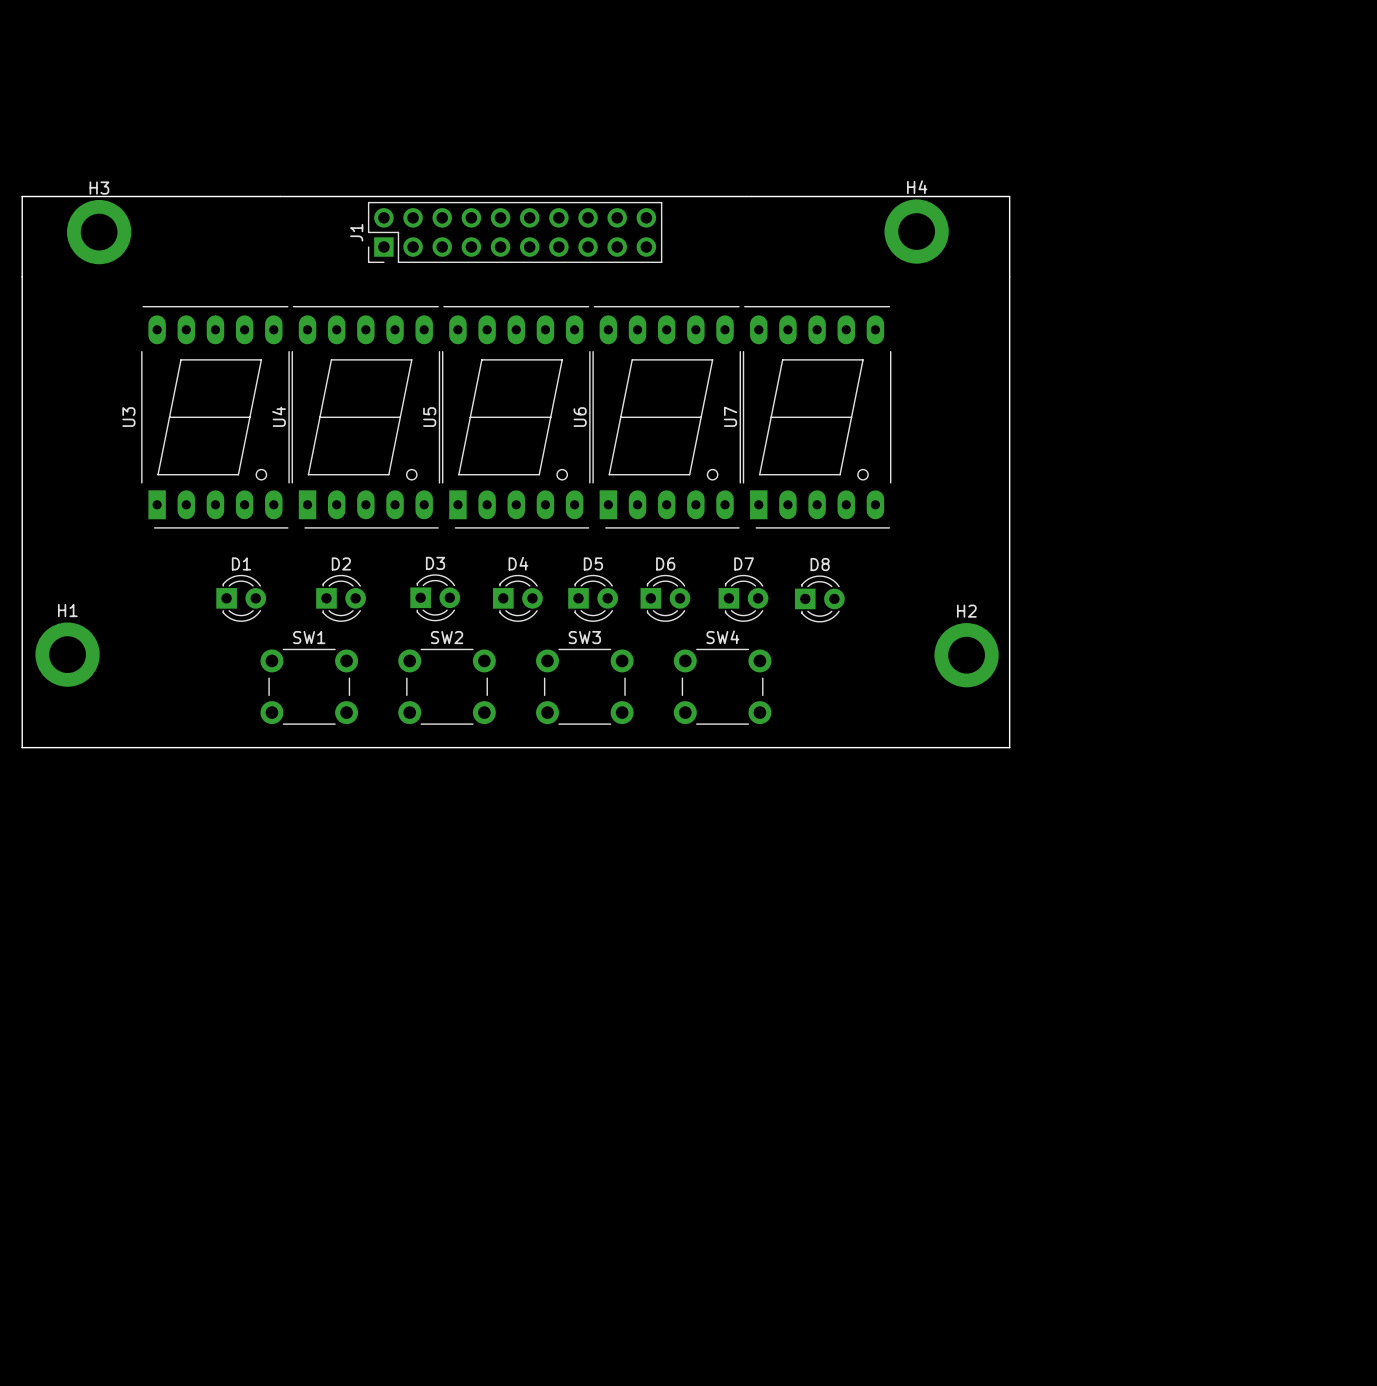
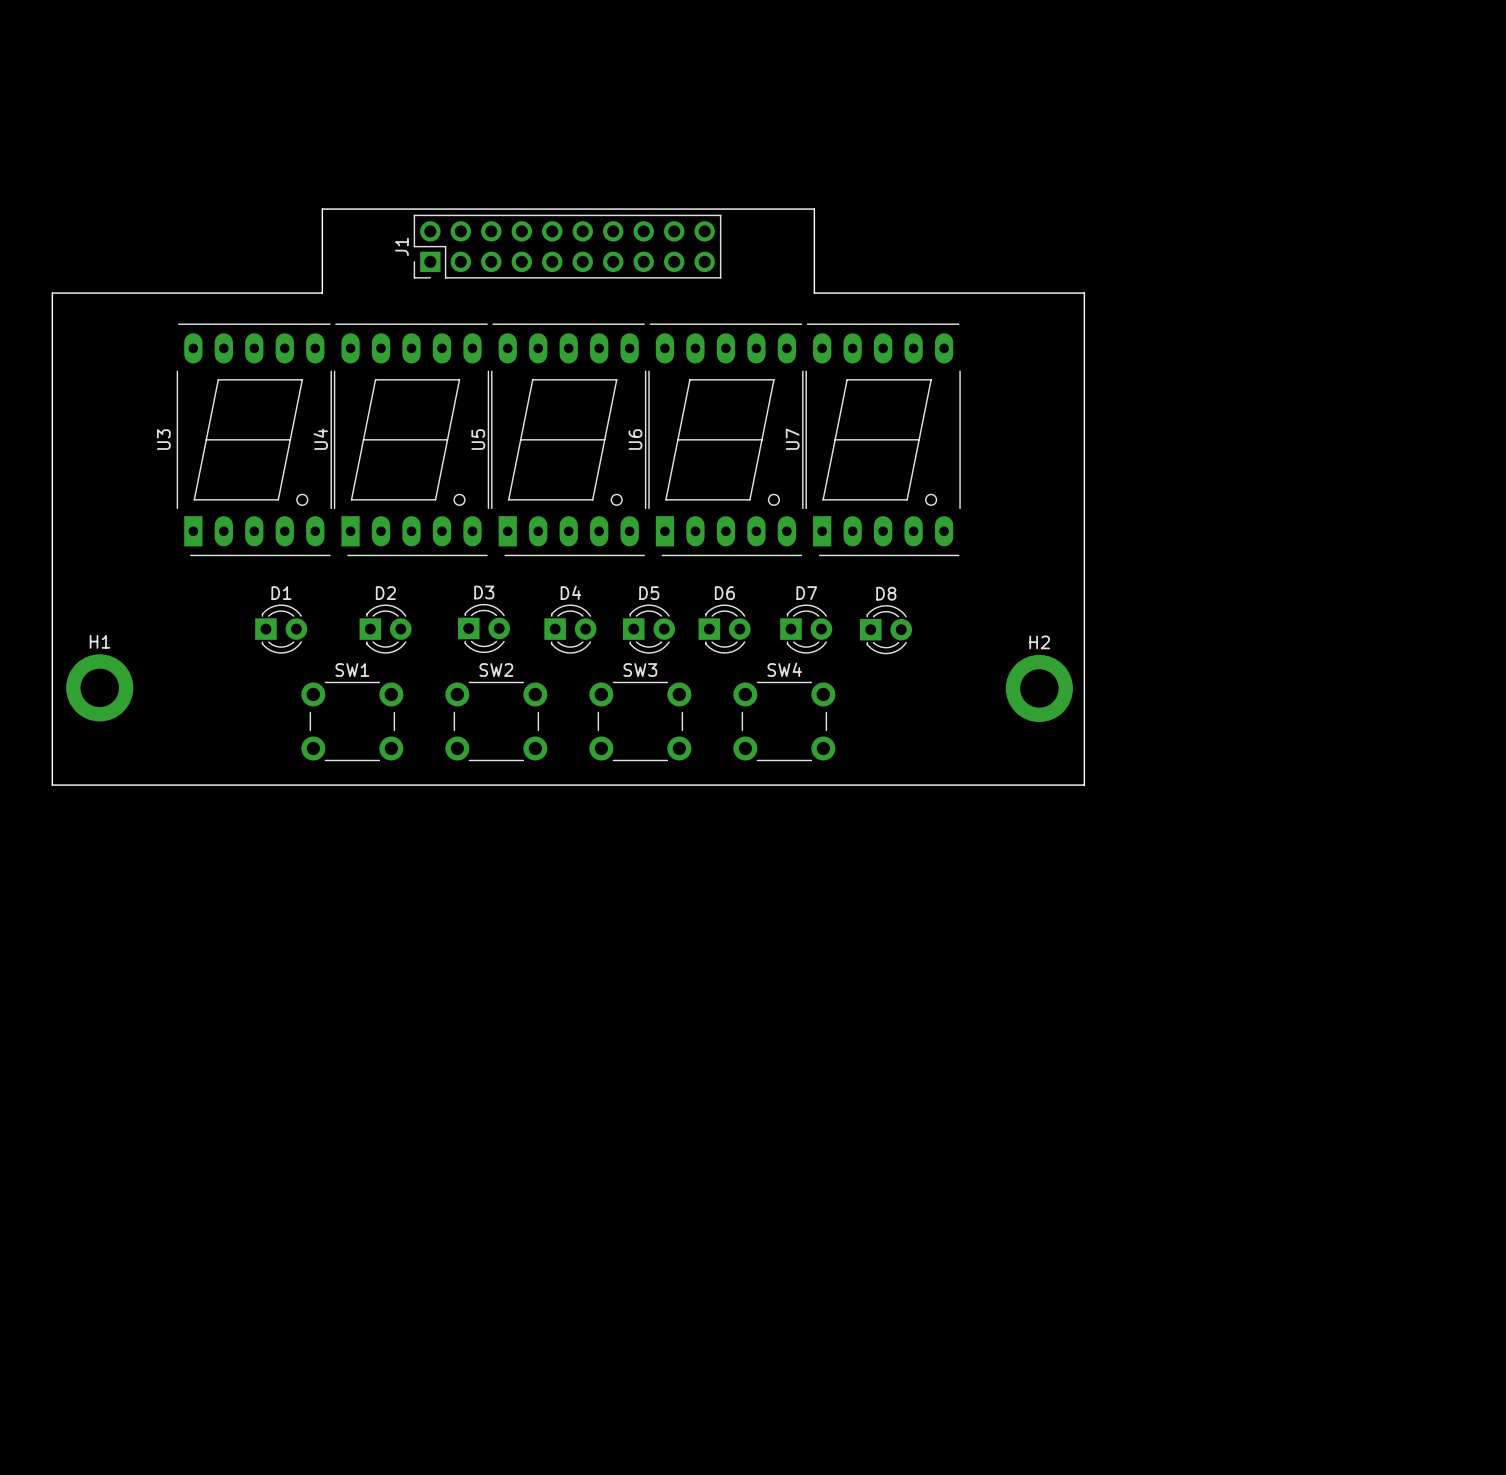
board edge: (280, 196) (22, 196) (22, 276) -> (322, 209) (322, 293) (52, 293)
board edge: (751, 196) (1009, 196) (1009, 276) -> (814, 209) (814, 293) (1084, 293)
H4: (916, 231) -> none
H3: (99, 232) -> none

